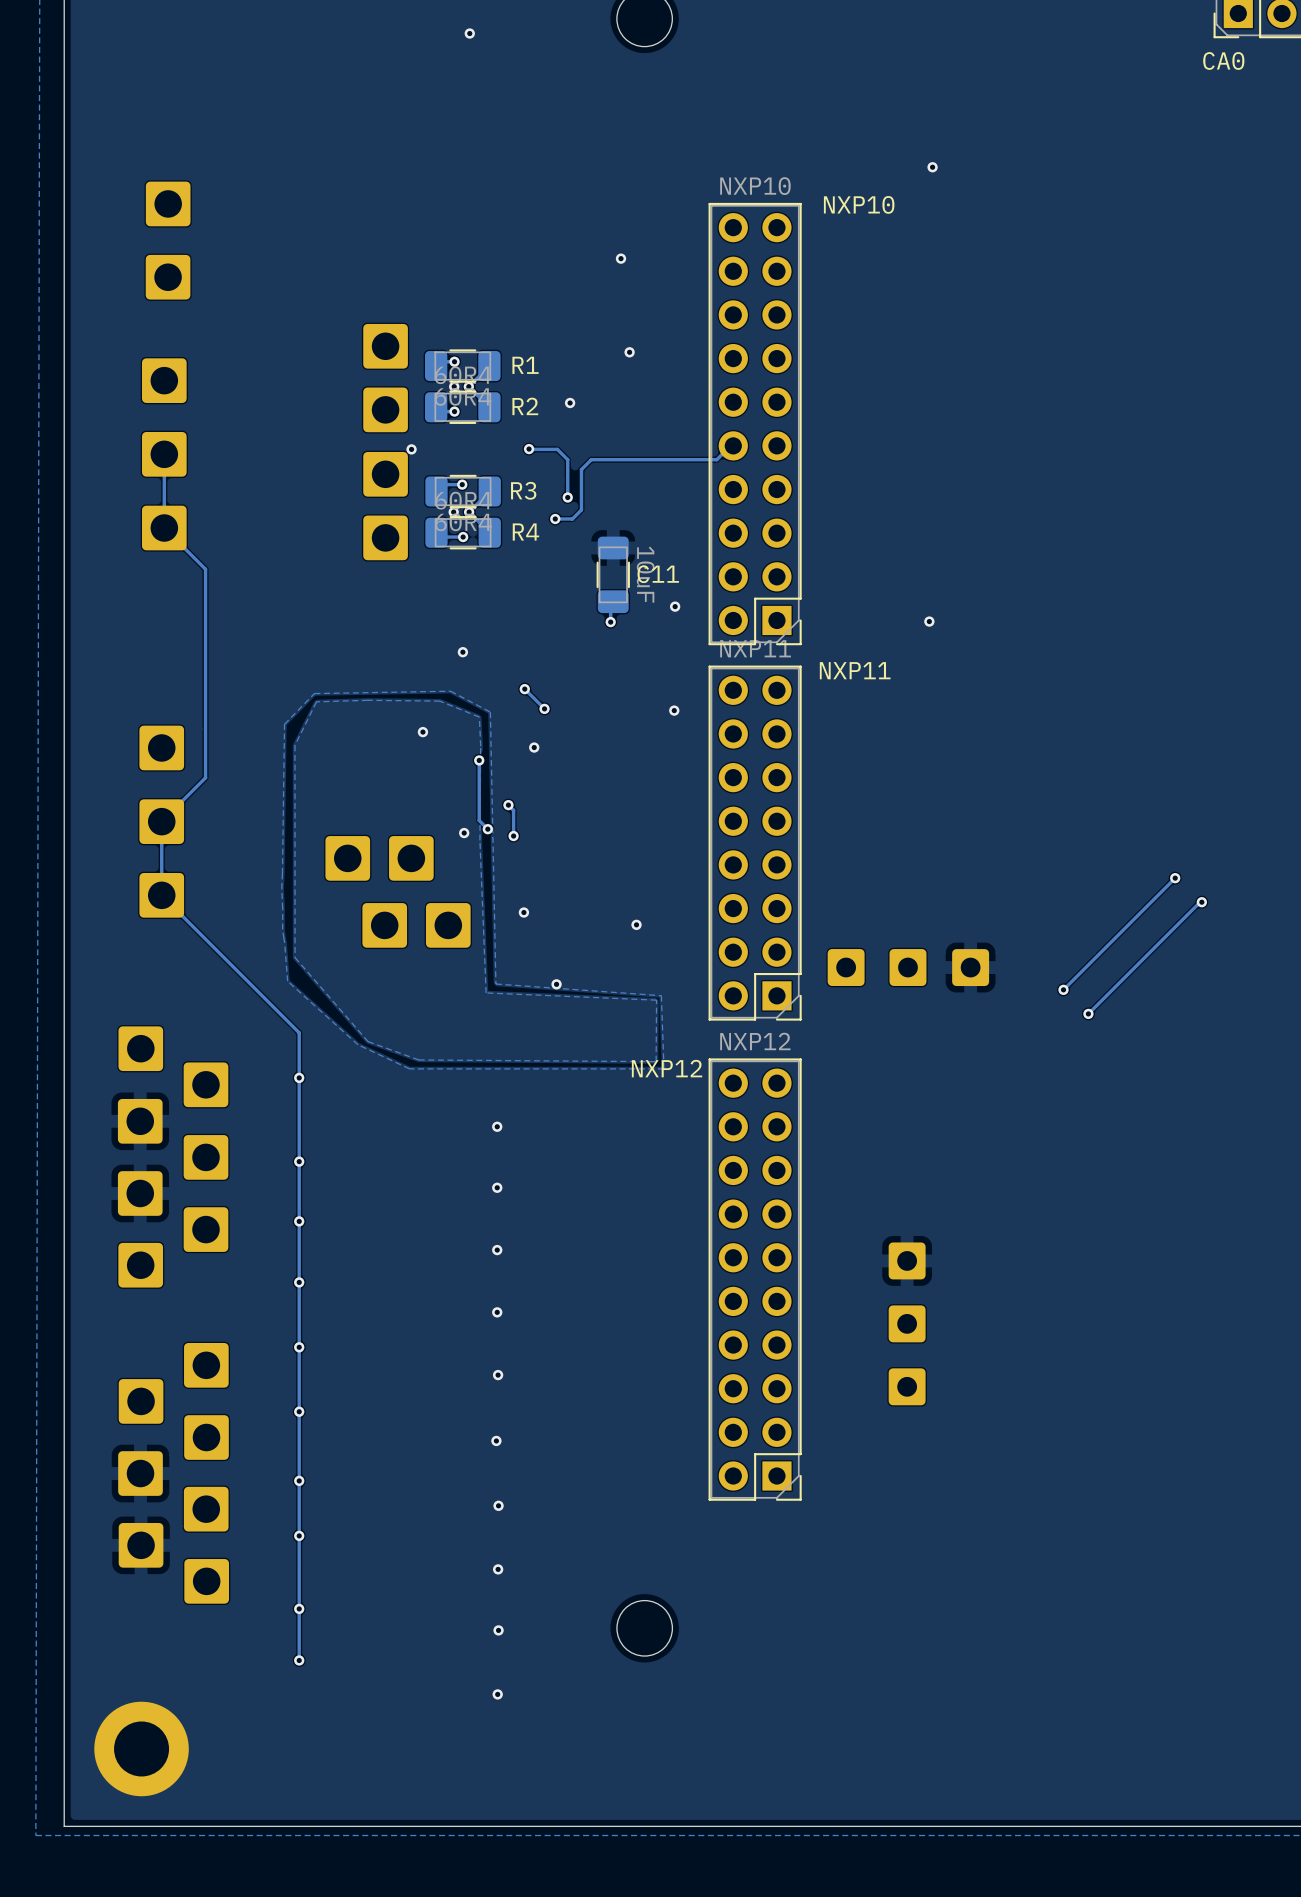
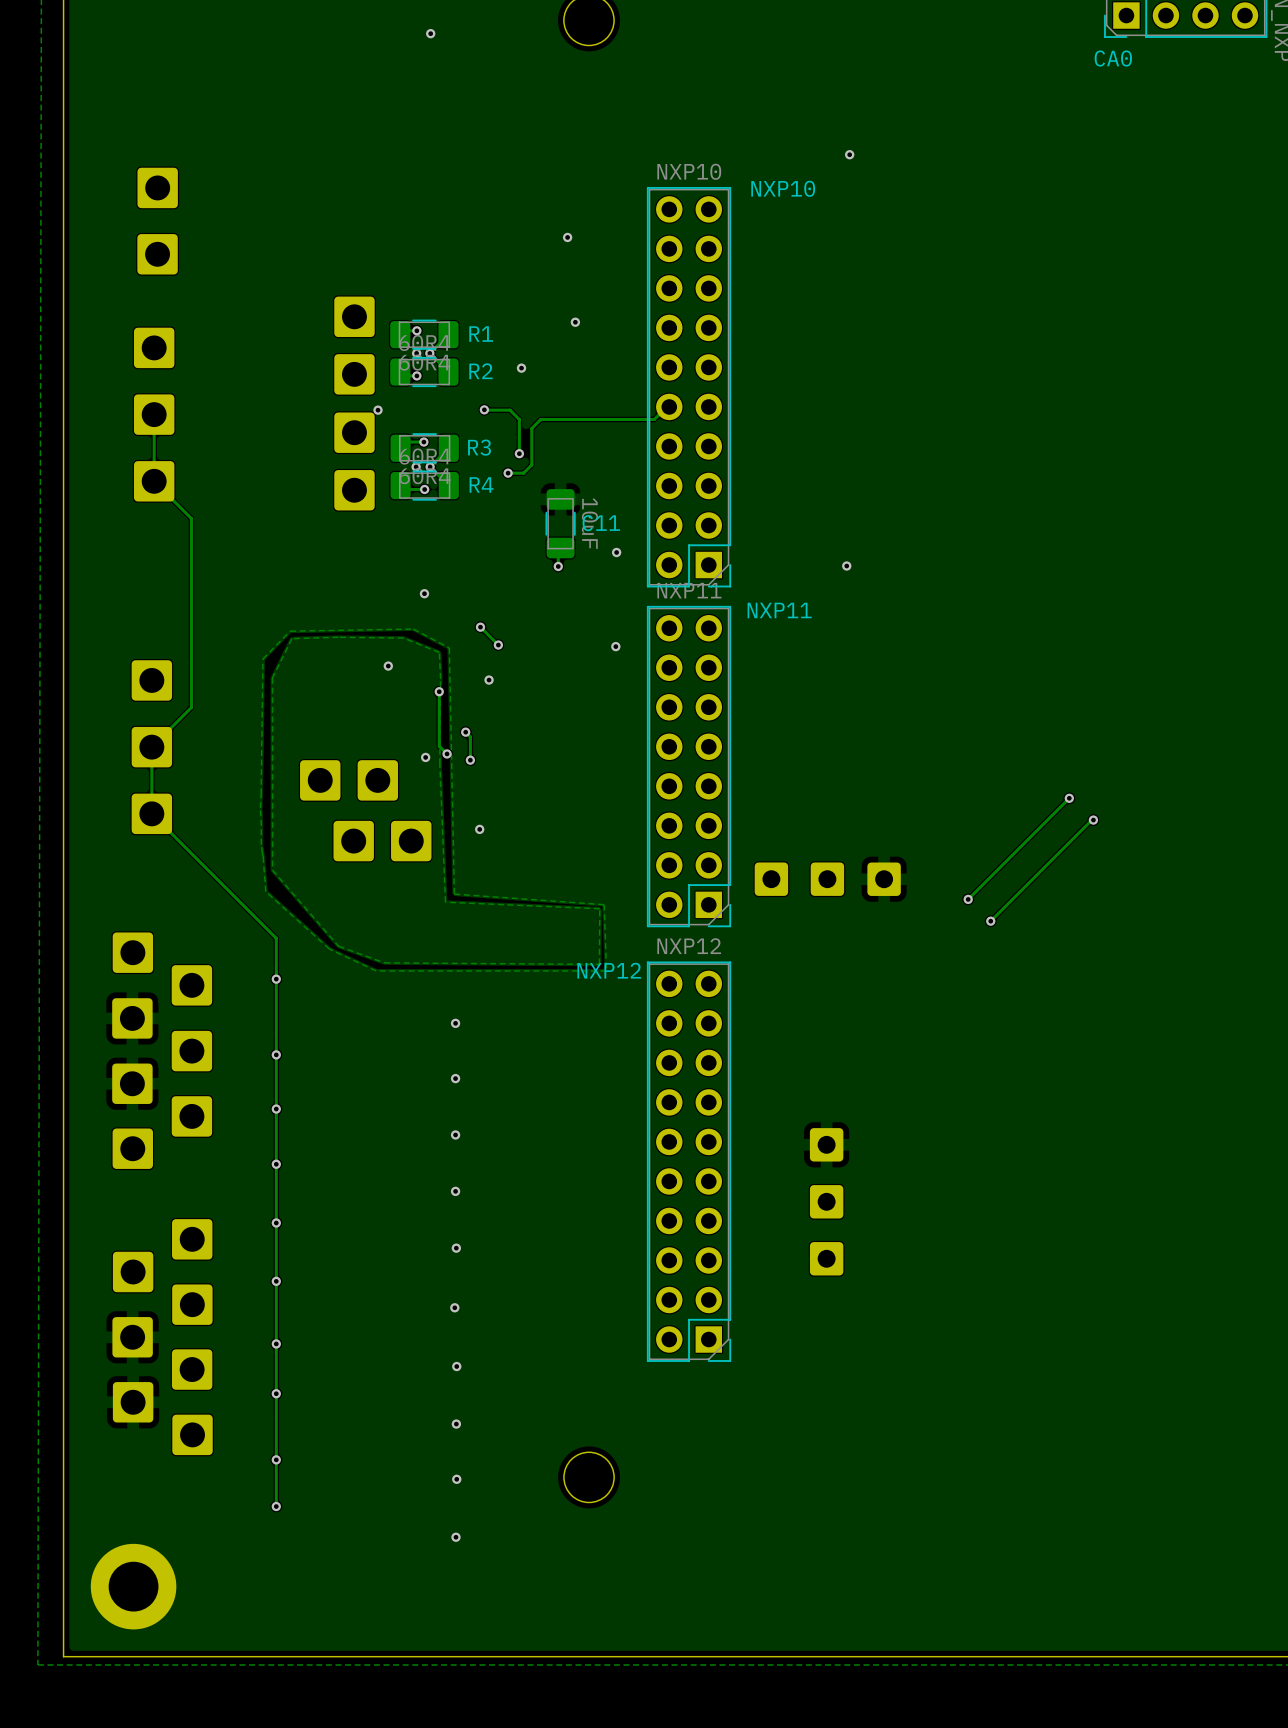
via: (636, 924) -> none
via: (556, 984) -> none

